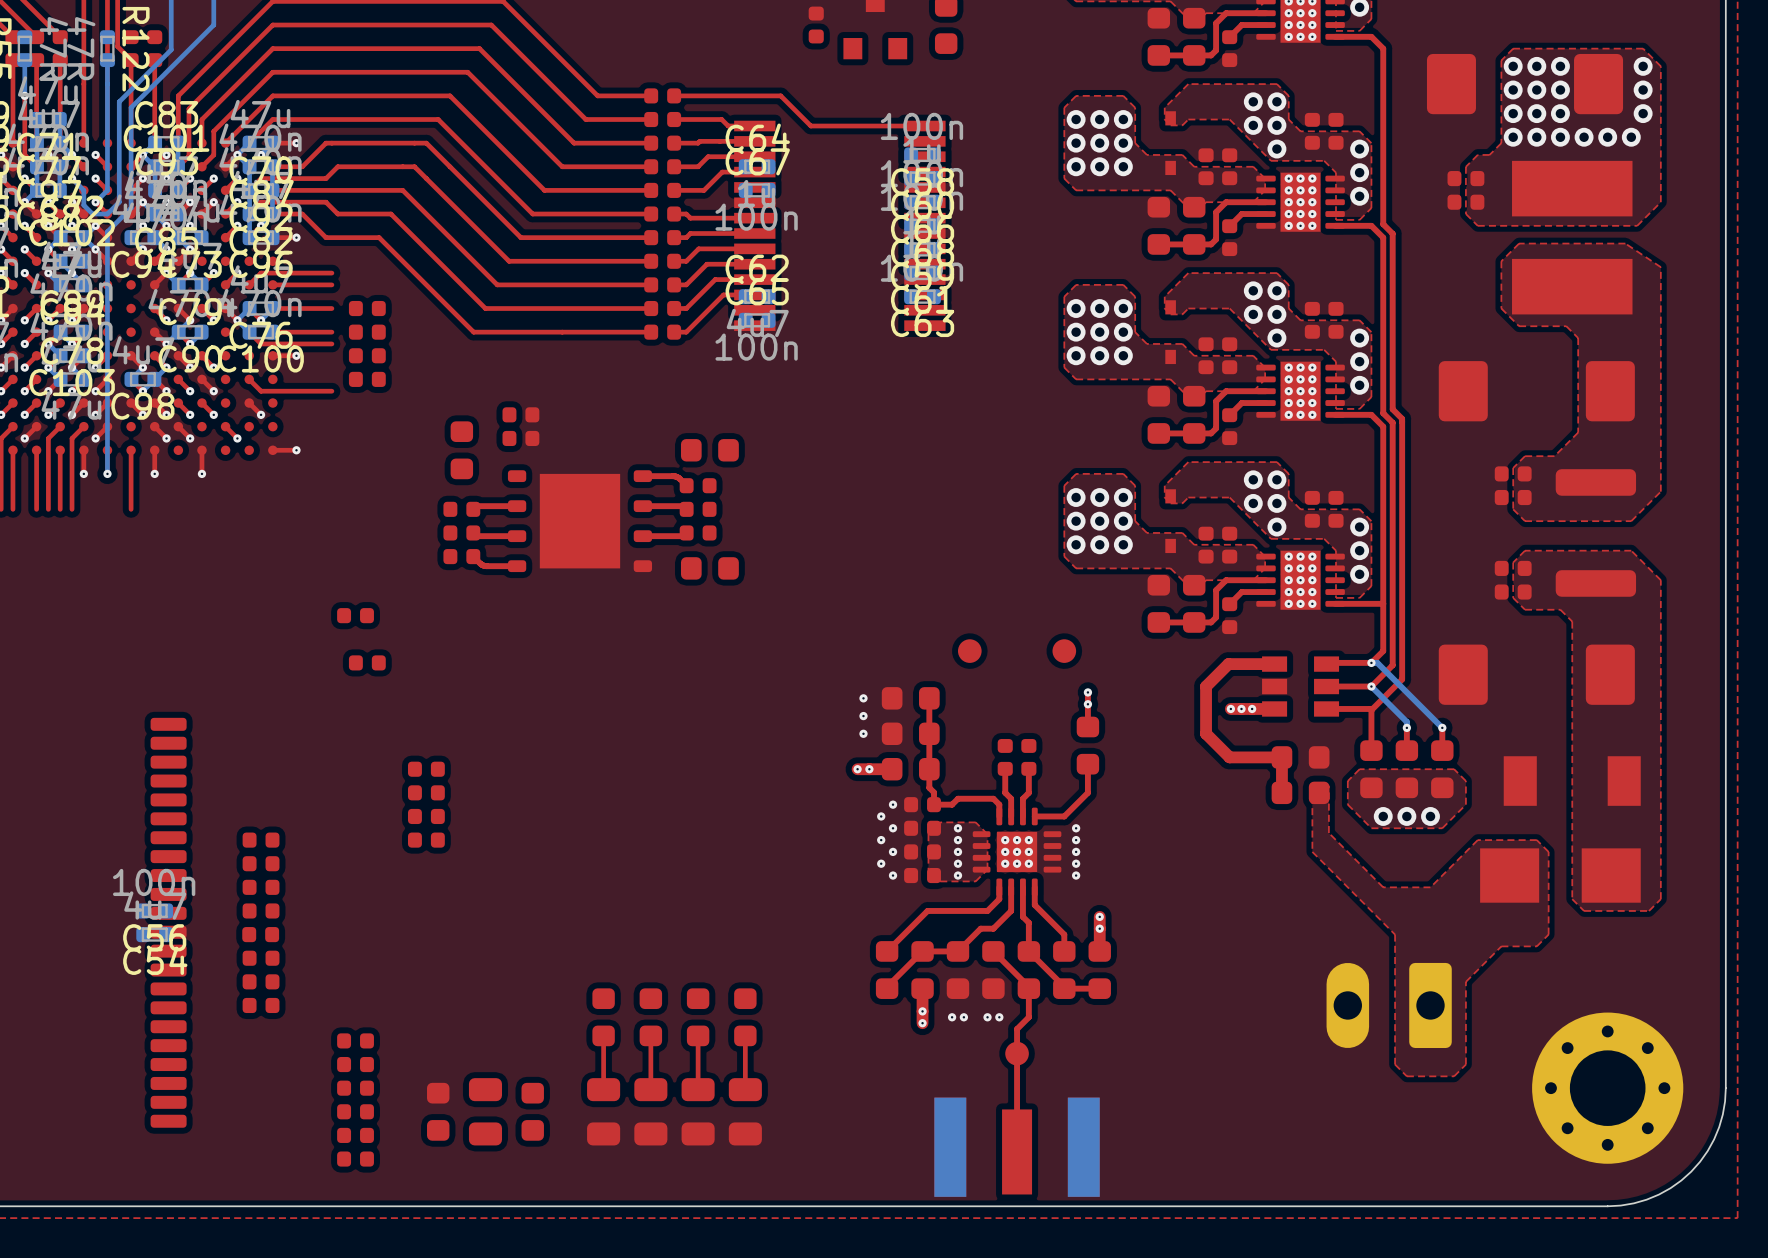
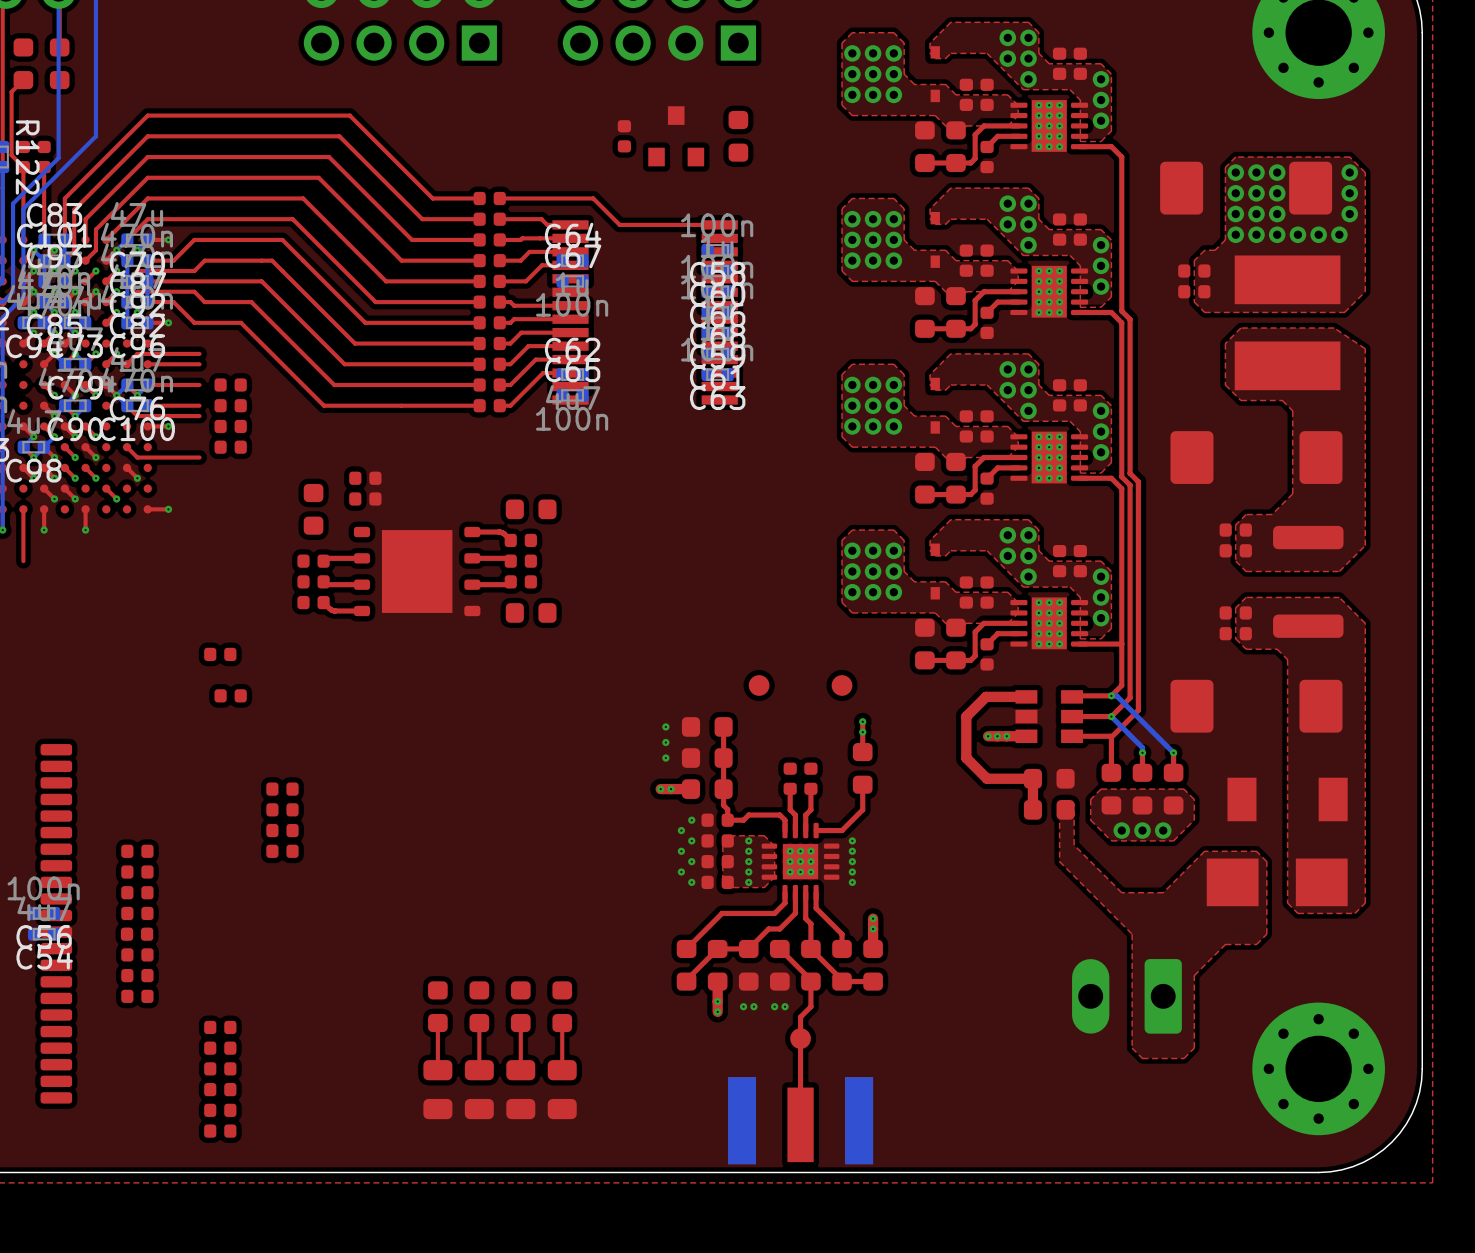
part: (438, 1111) -> none
part: (485, 1111) -> none
part: (532, 1111) -> none

